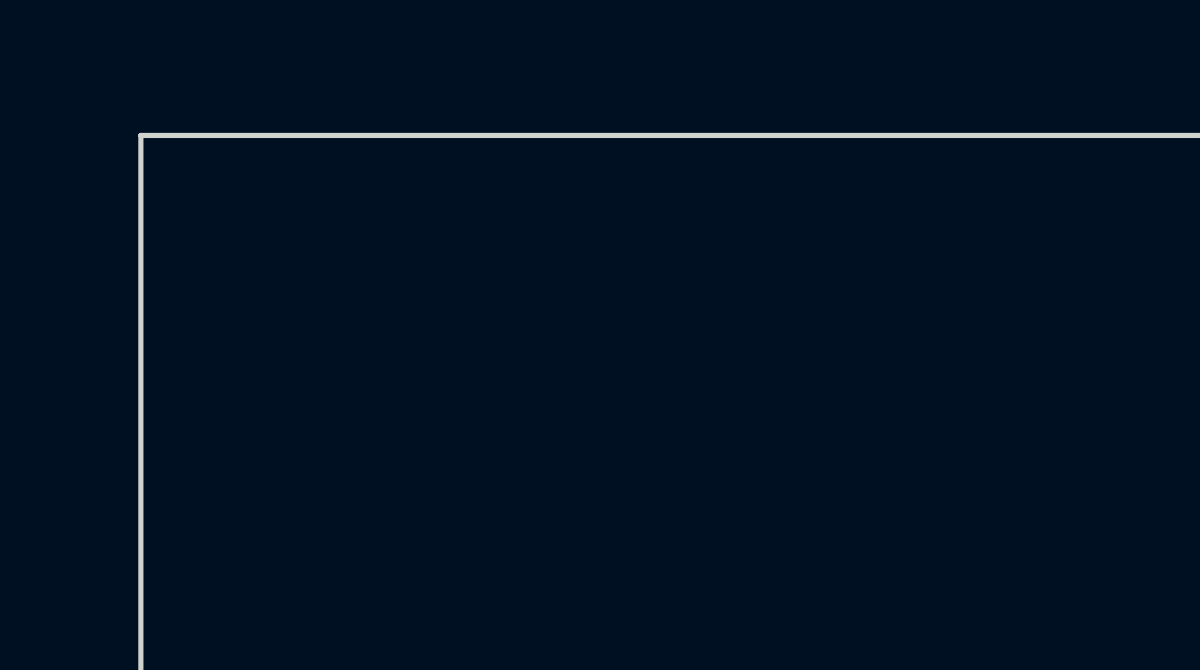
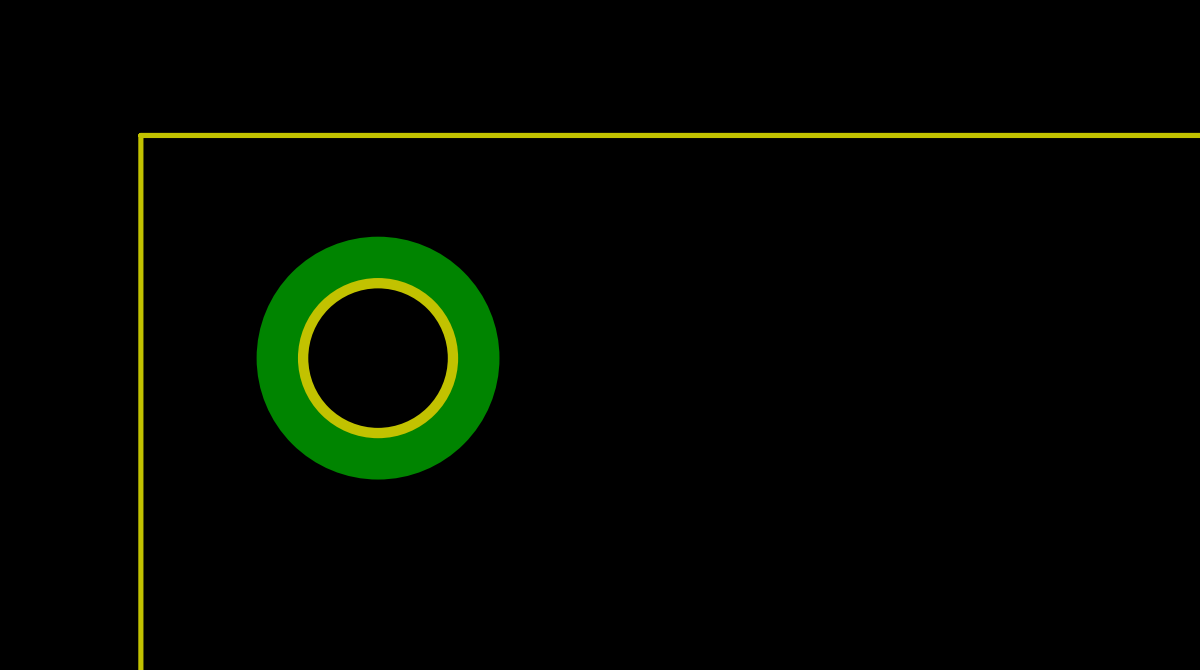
part: none -> (378, 358)

